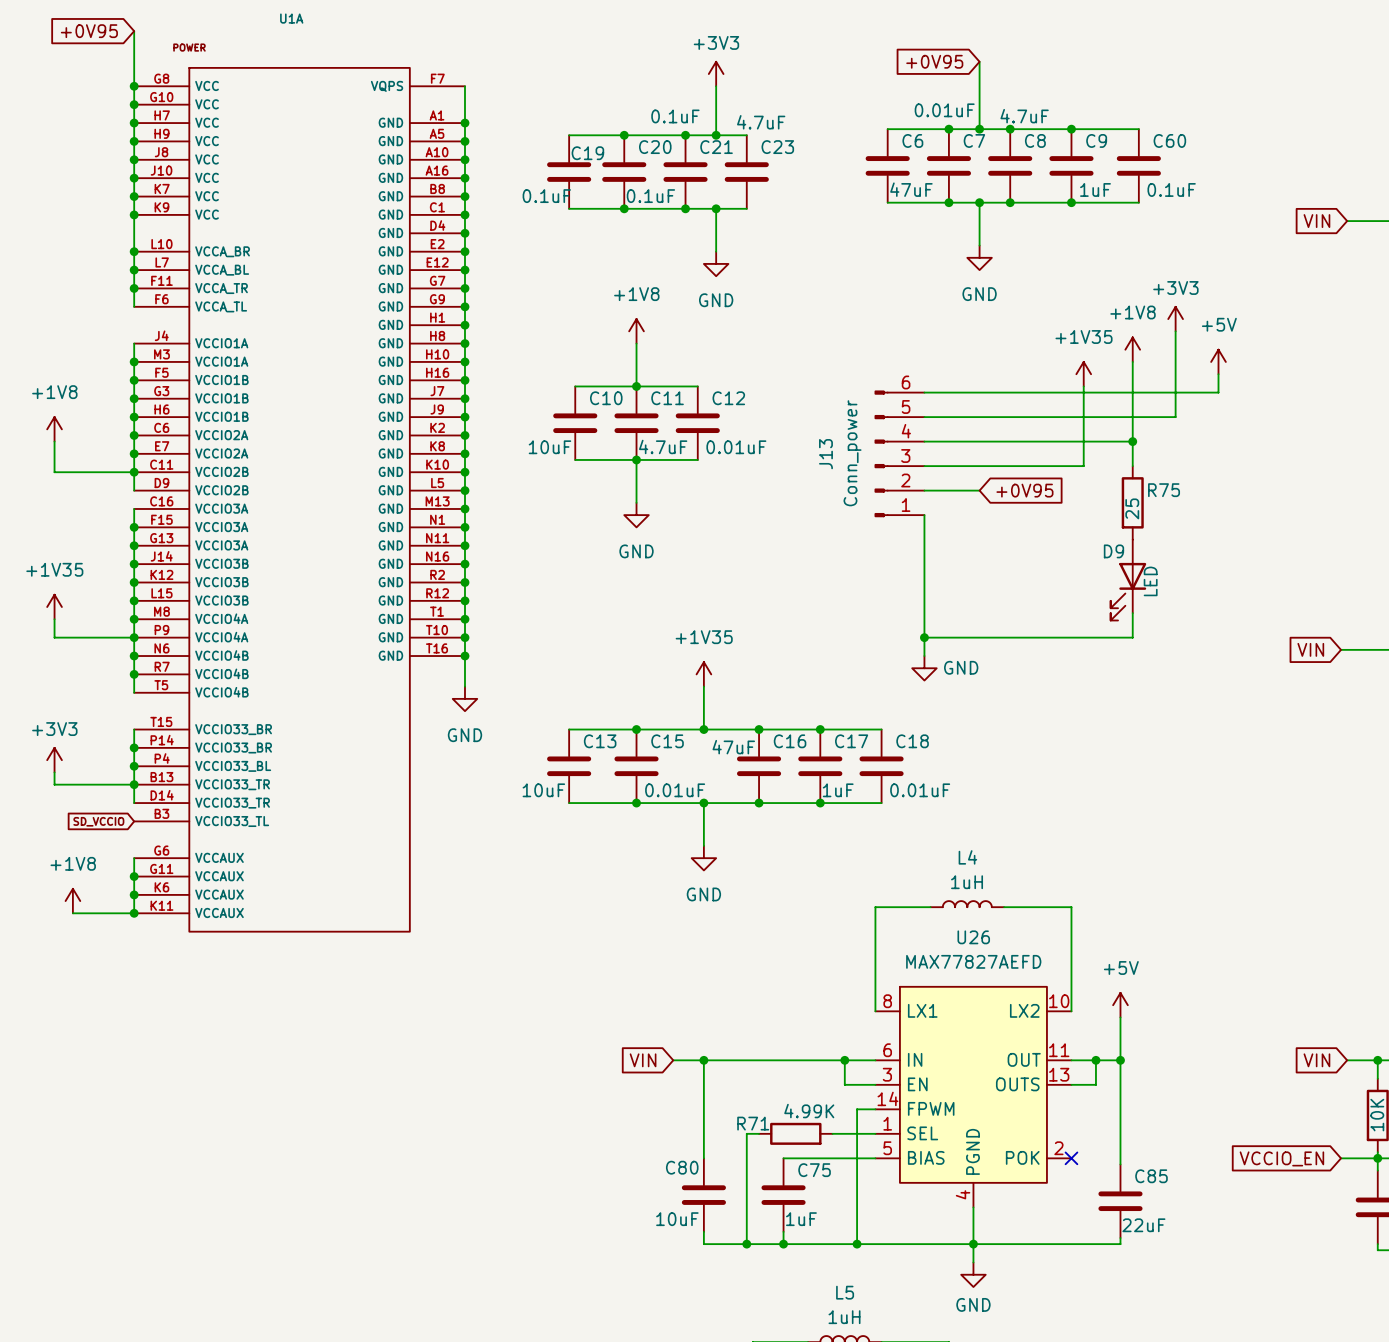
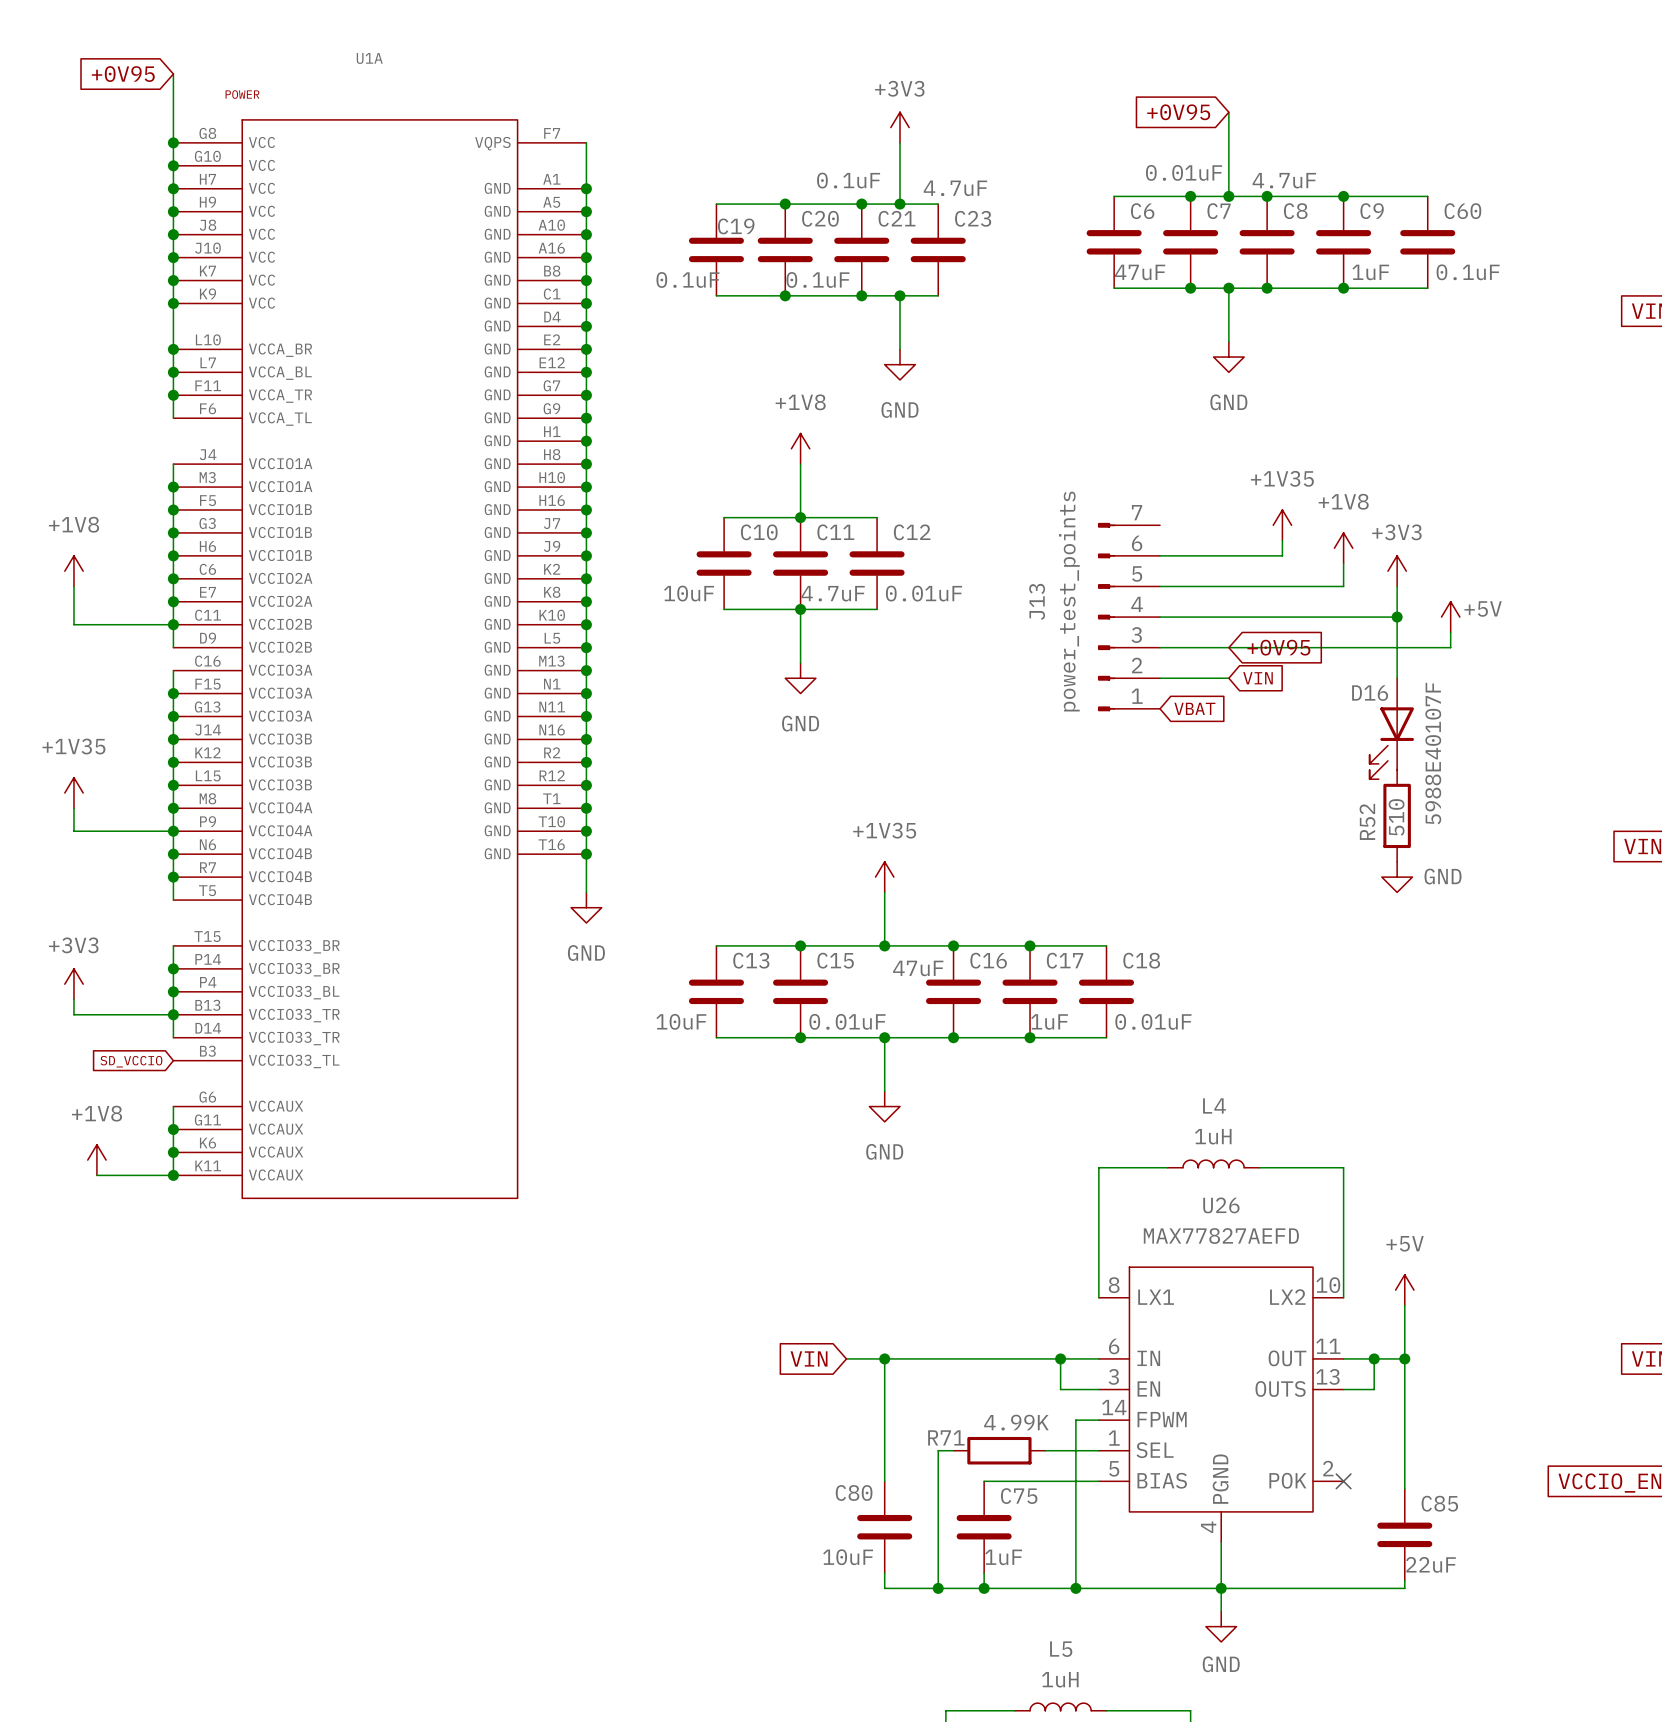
power symbol position: +3V3 (1175, 319) -> +3V3 (1397, 571)
power symbol text position: +5V (1219, 324) -> +5V (1483, 608)
wire: (1175, 331) (1175, 417) (1022, 417) -> (1282, 540) (1282, 555)
power symbol position: +1V8 (1132, 349) -> +1V8 (1343, 548)
wire: (1132, 361) (1132, 466) -> none
power symbol position: +5V (1218, 361) -> +5V (1450, 617)
power symbol position: +1V35 (1083, 374) -> +1V35 (1282, 525)
wire: (1218, 374) (1218, 392) (924, 392) -> none
wire: (1083, 386) (1083, 466) -> (1397, 617) (1358, 617)
J13 symbol: [874, 390, 925, 518] -> [1097, 522, 1161, 712]
wire: (1071, 441) (1132, 441) -> (1343, 586) (1343, 563)
wire: none -> (1397, 586) (1397, 678)
junction position: (1132, 441) -> (1397, 617)
J13 value: Conn_power (852, 453) -> power_test_points (1069, 601)
wire: none -> (1450, 632) (1450, 647) (1228, 647)
R75: 25 (1132, 502) -> none
wire: (924, 515) (924, 656) -> (1160, 678) (1228, 678)
global label: none -> VIN (1258, 678)
global label: none -> VBAT (1194, 708)
D16: none -> 5988E40107F (1391, 728)
D9: LED (1128, 580) -> none
wire: (1132, 613) (1132, 637) (924, 637) -> none
R52: none -> 510 (1397, 815)
junction: (924, 637) -> none
power symbol position: GND (924, 668) -> GND (1397, 877)

